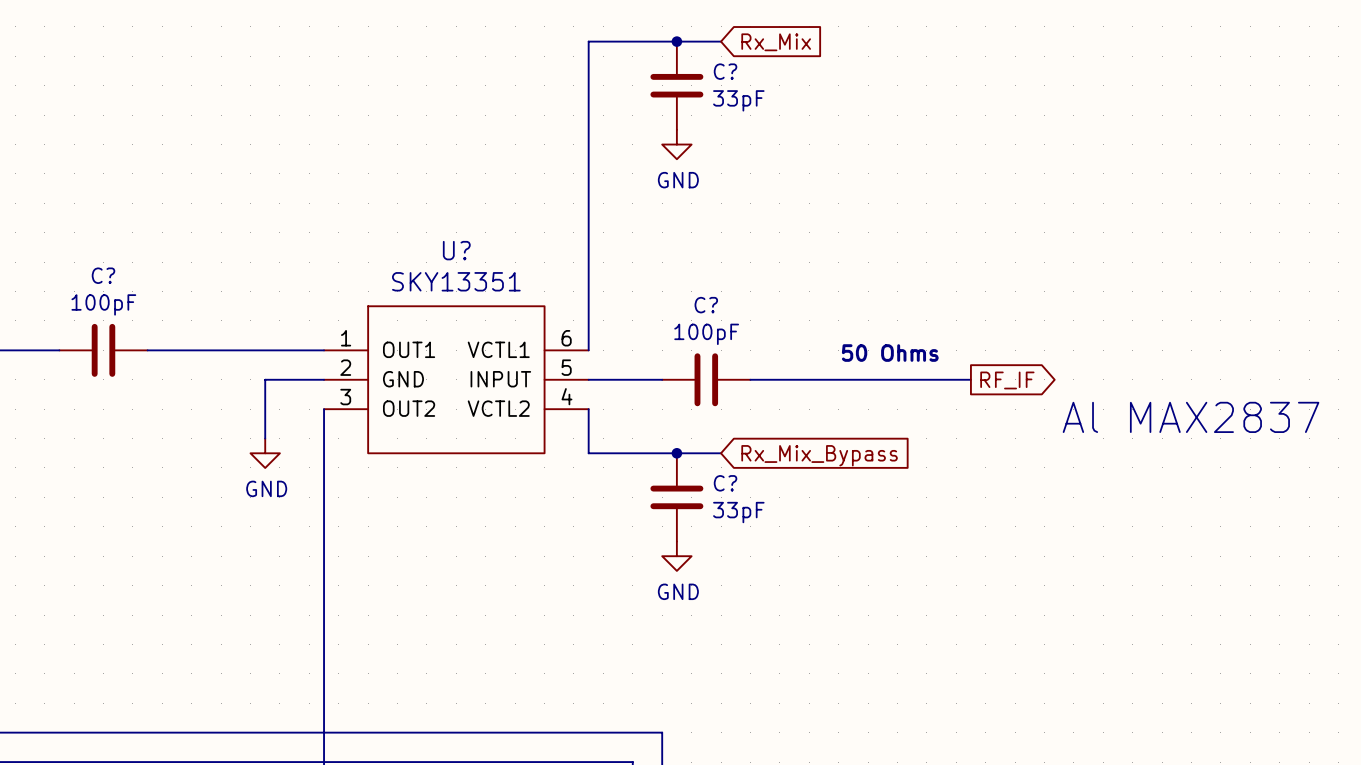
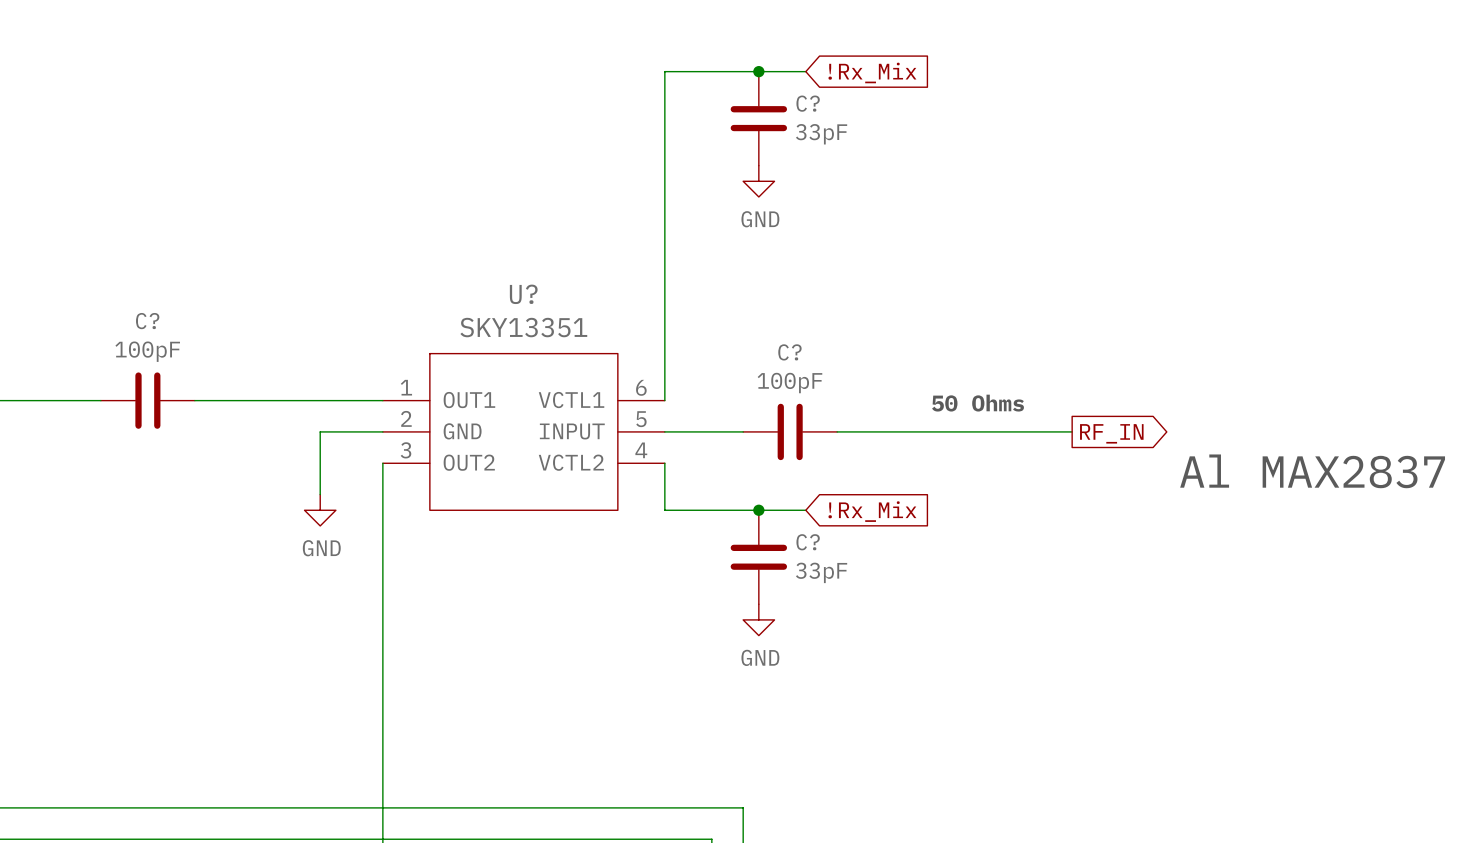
global label: Rx_Mix (776, 42) -> !Rx_Mix (872, 72)
global label: RF_IF (1007, 380) -> RF_IN (1111, 433)
global label: Rx_Mix_Bypass (819, 455) -> !Rx_Mix (872, 511)

